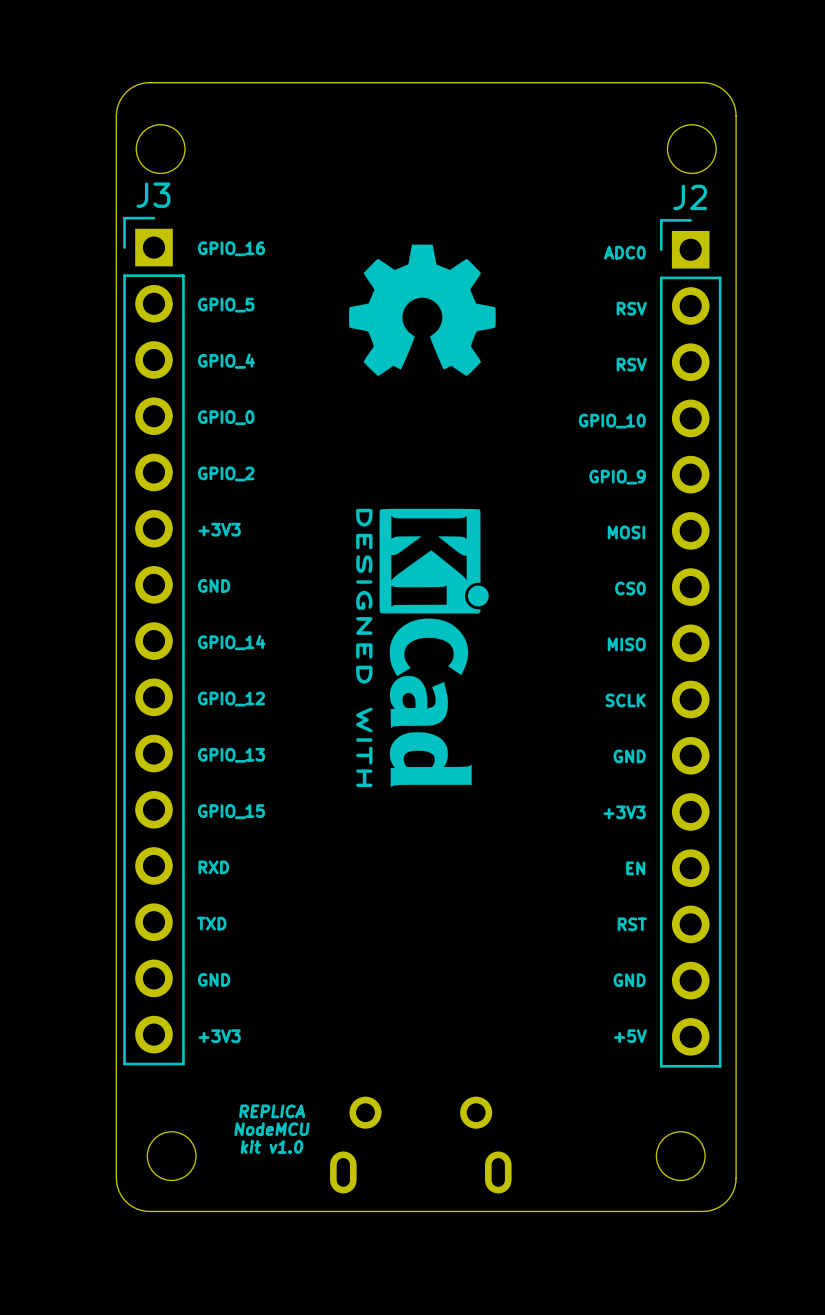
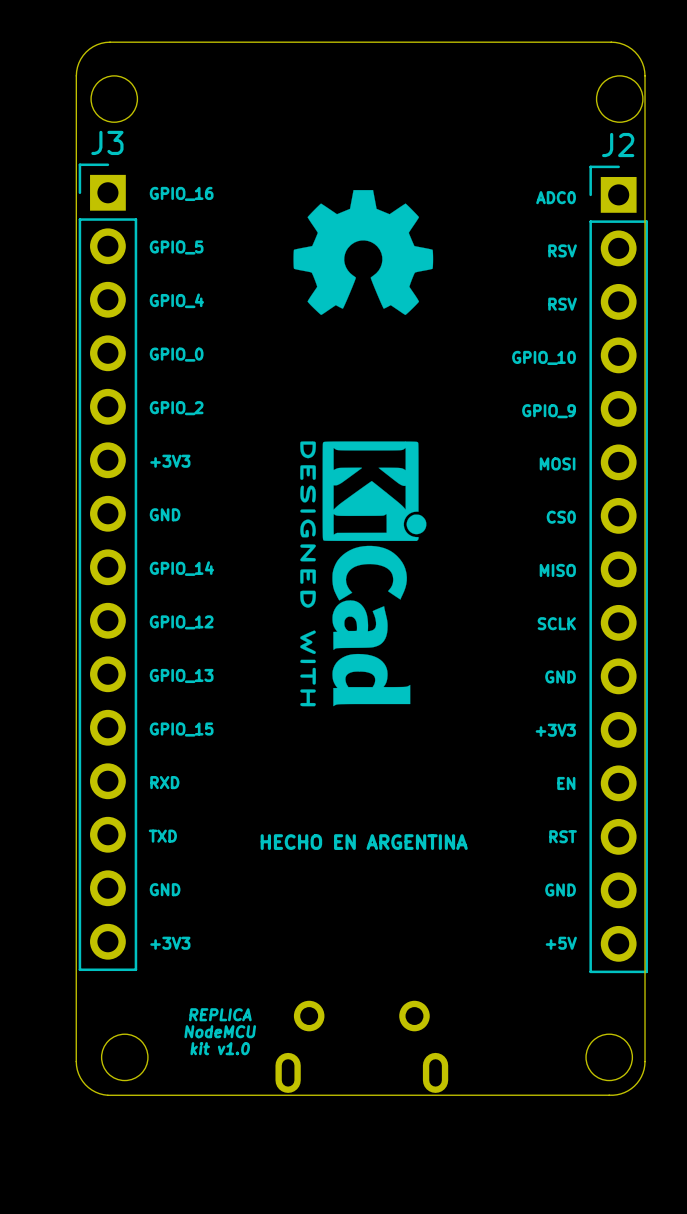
board edge: (702, 82) (149, 82) (132, 87) (120, 99) (116, 115) (116, 1178) (120, 1194) (132, 1207) (149, 1211) (702, 1211) (719, 1207) (731, 1194) (736, 1178) (736, 115) (733, 103) (726, 92) (715, 85) (702, 82) -> (611, 42) (624, 44) (635, 52) (642, 62) (645, 75) (645, 1061) (641, 1076) (628, 1090) (613, 1095) (107, 1095) (95, 1092) (82, 1081) (78, 1074) (76, 1061) (76, 75) (78, 62) (89, 49) (101, 43) (110, 42) (611, 42)
text: none -> HECHO EN ARGENTINA (364, 842)

